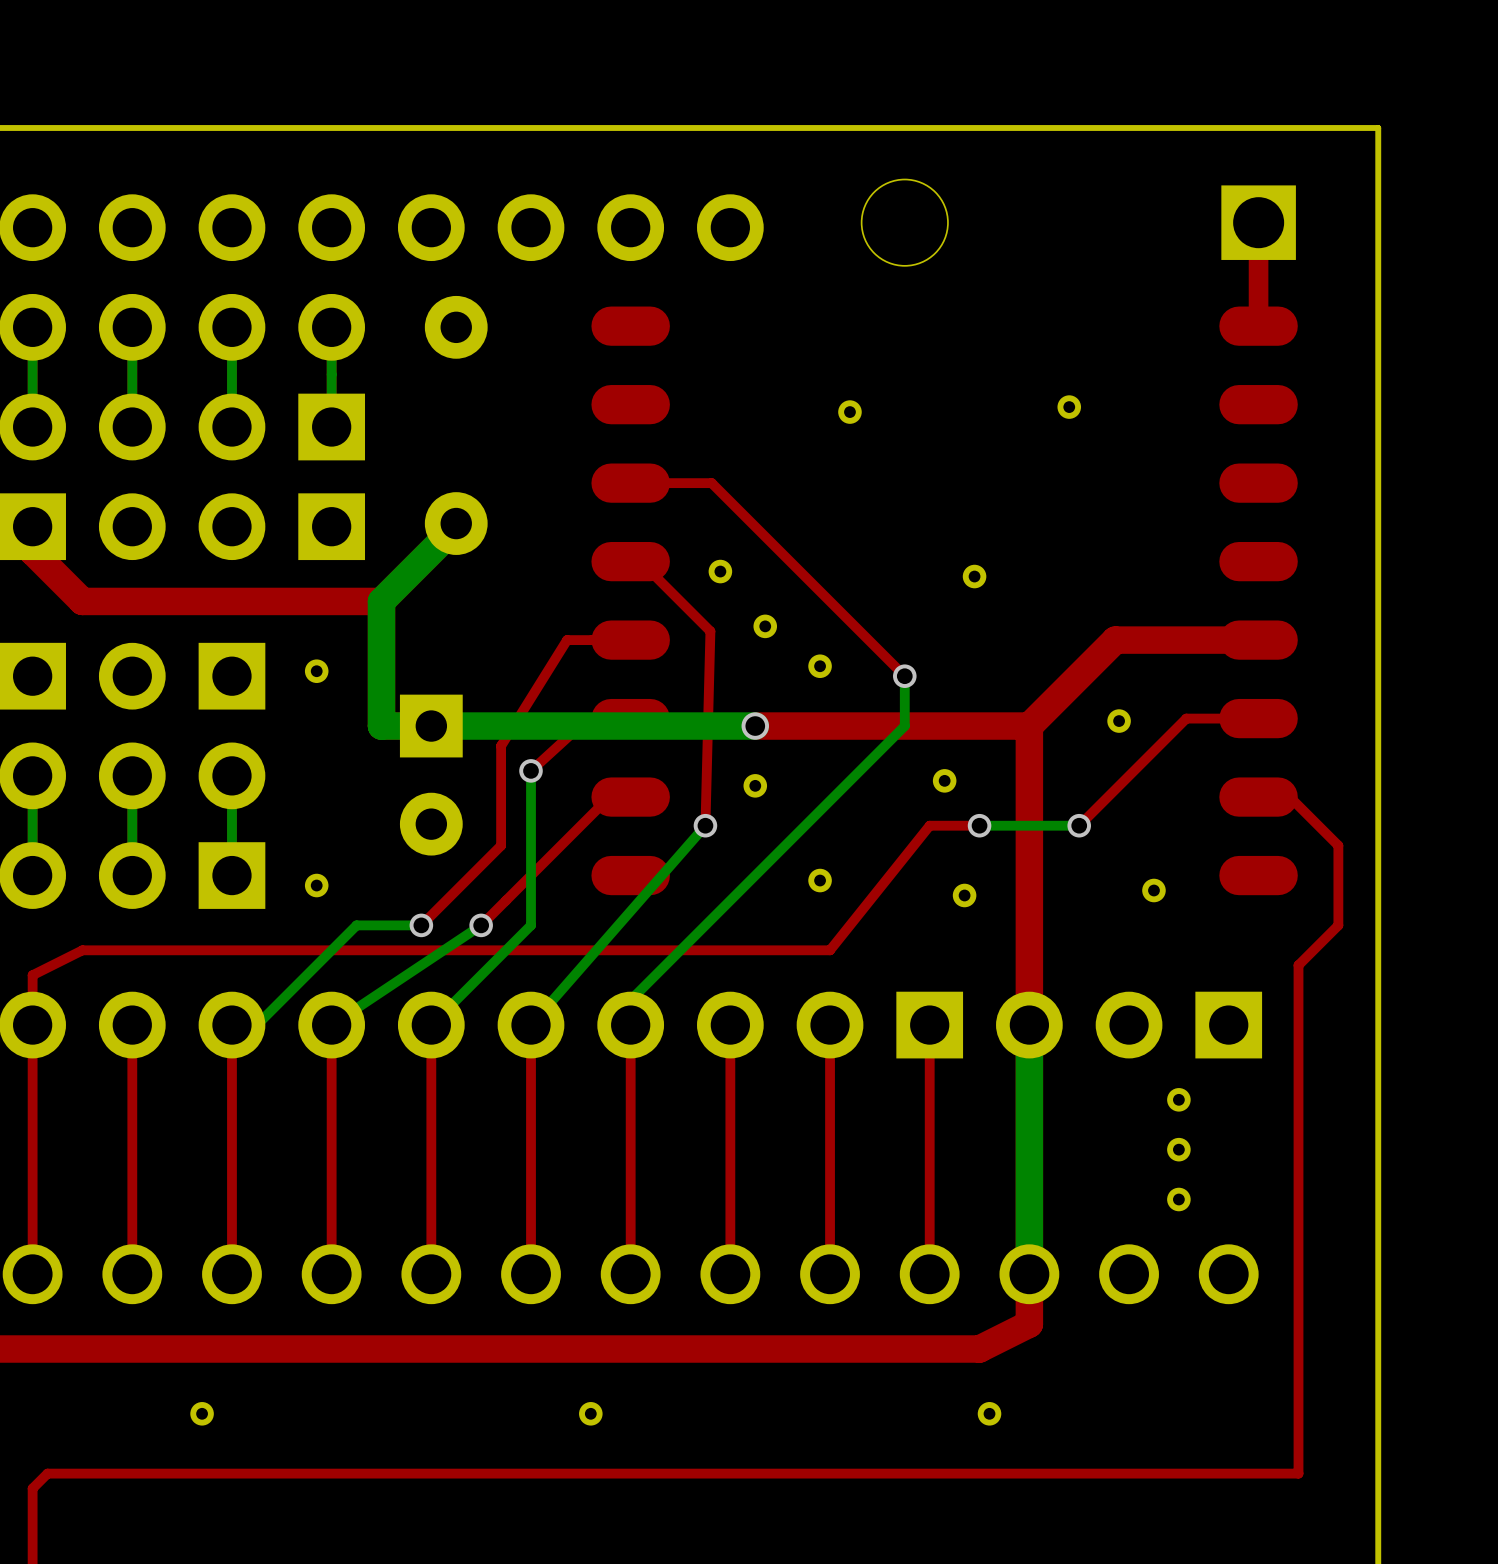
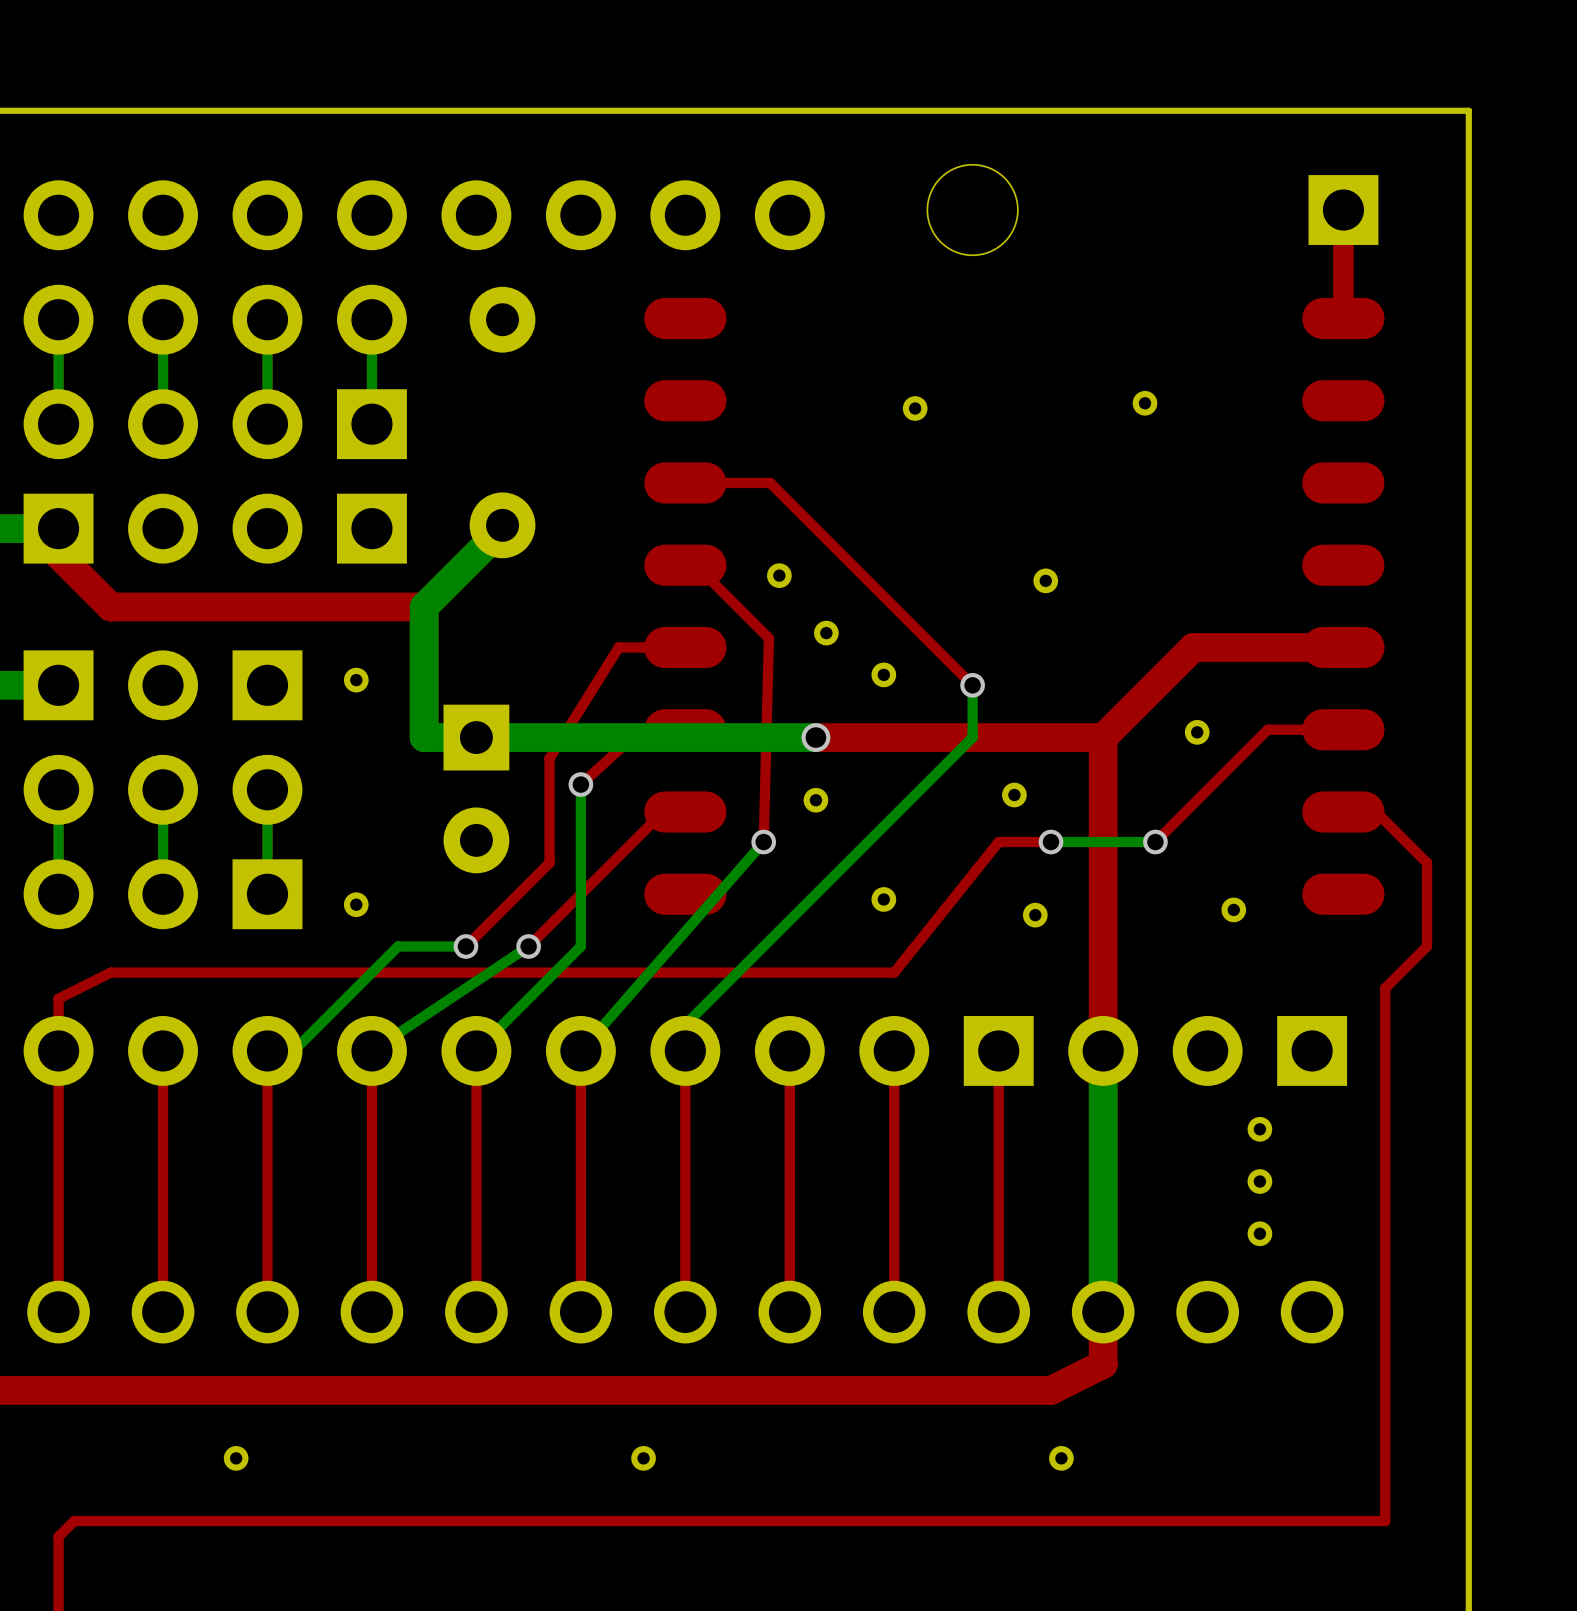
part footprint: [1221, 185, 1296, 260] -> [1308, 175, 1379, 245]

